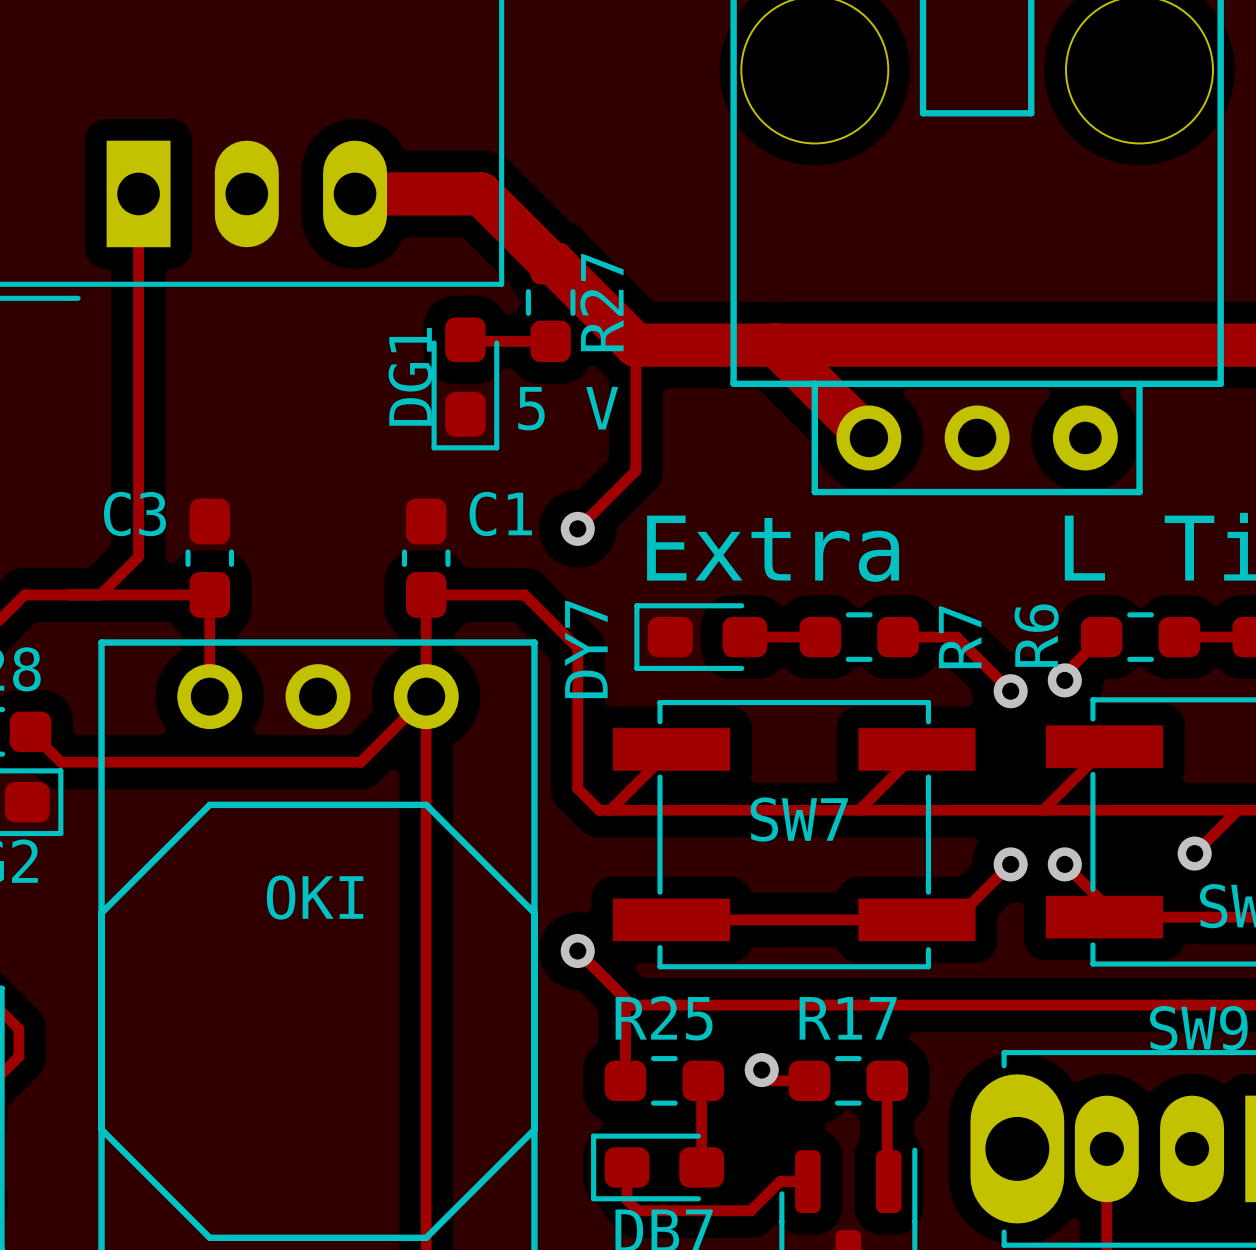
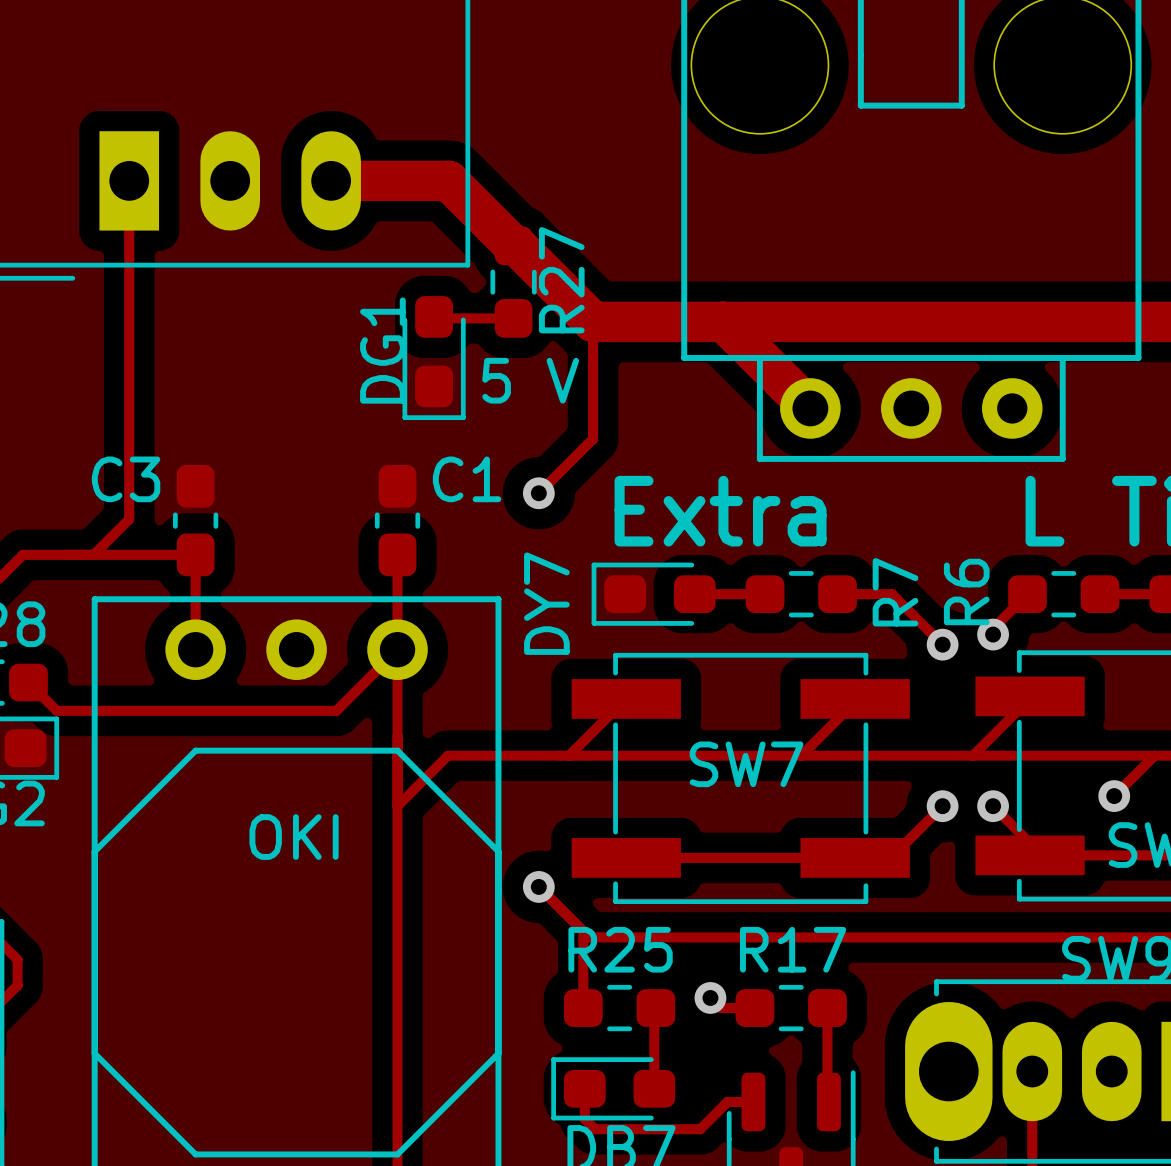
track: (427, 594) (524, 594) (577, 647) (577, 788) (599, 810) -> (397, 806) (447, 755) (559, 755)

